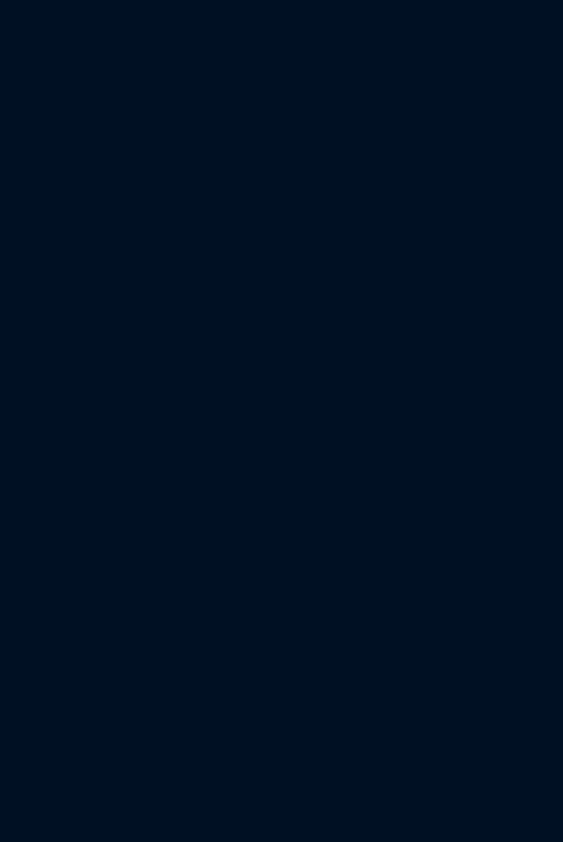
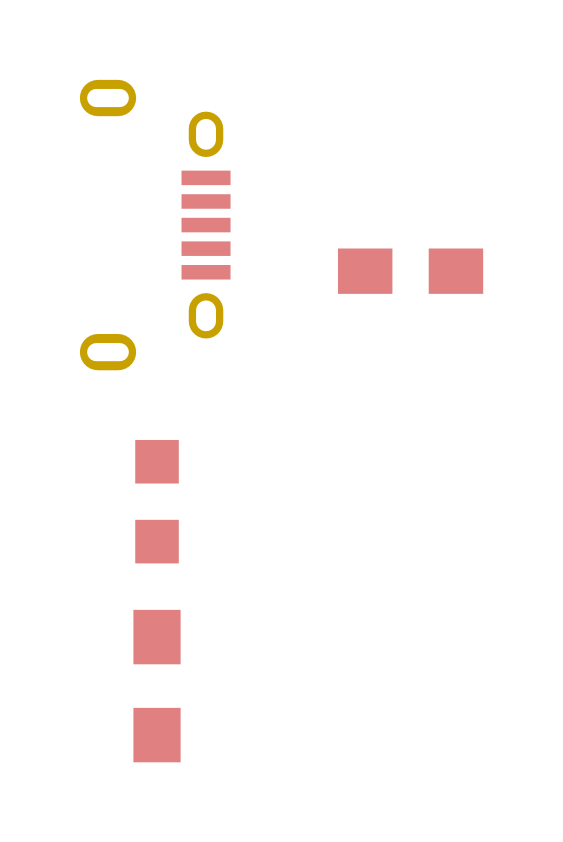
part: none -> (155, 225)
part: none -> (410, 271)
part: none -> (157, 501)
part: none -> (157, 686)

